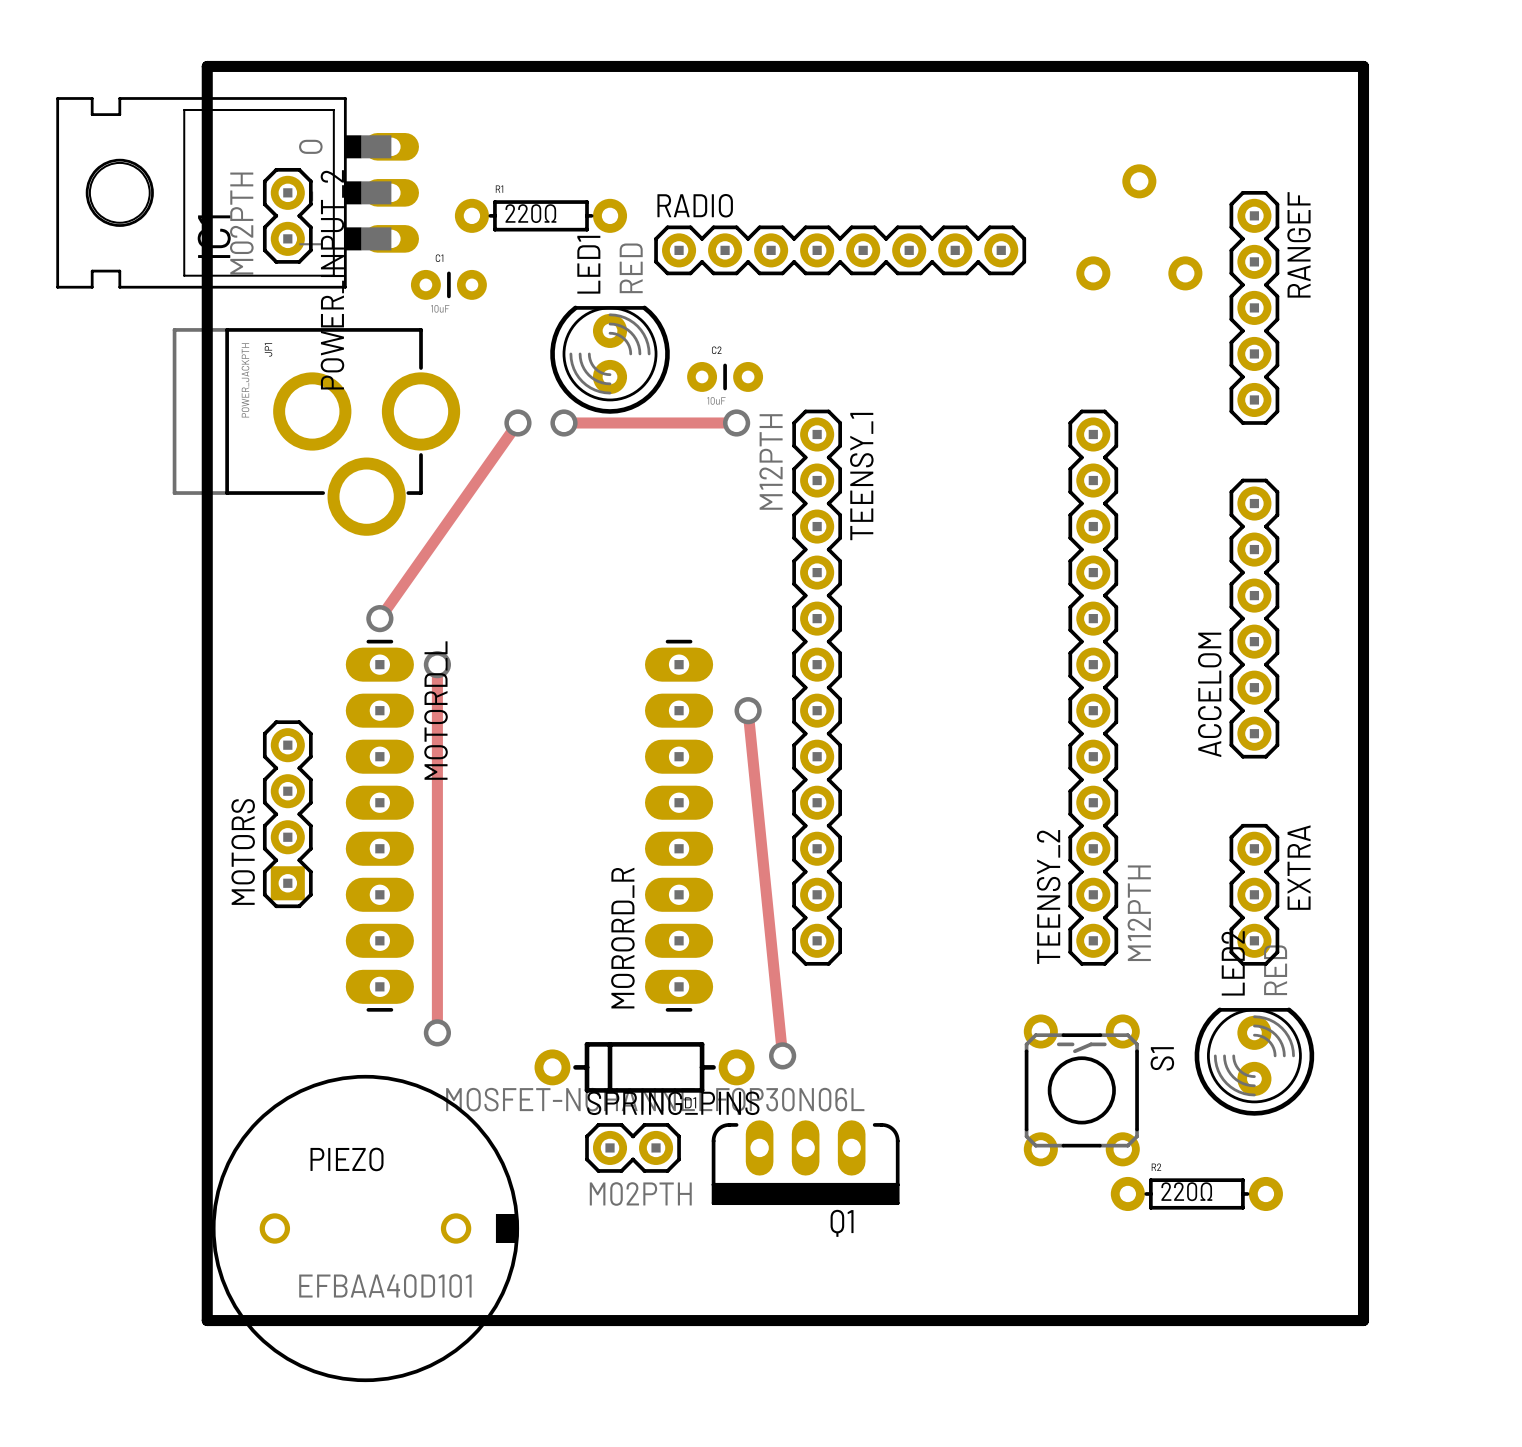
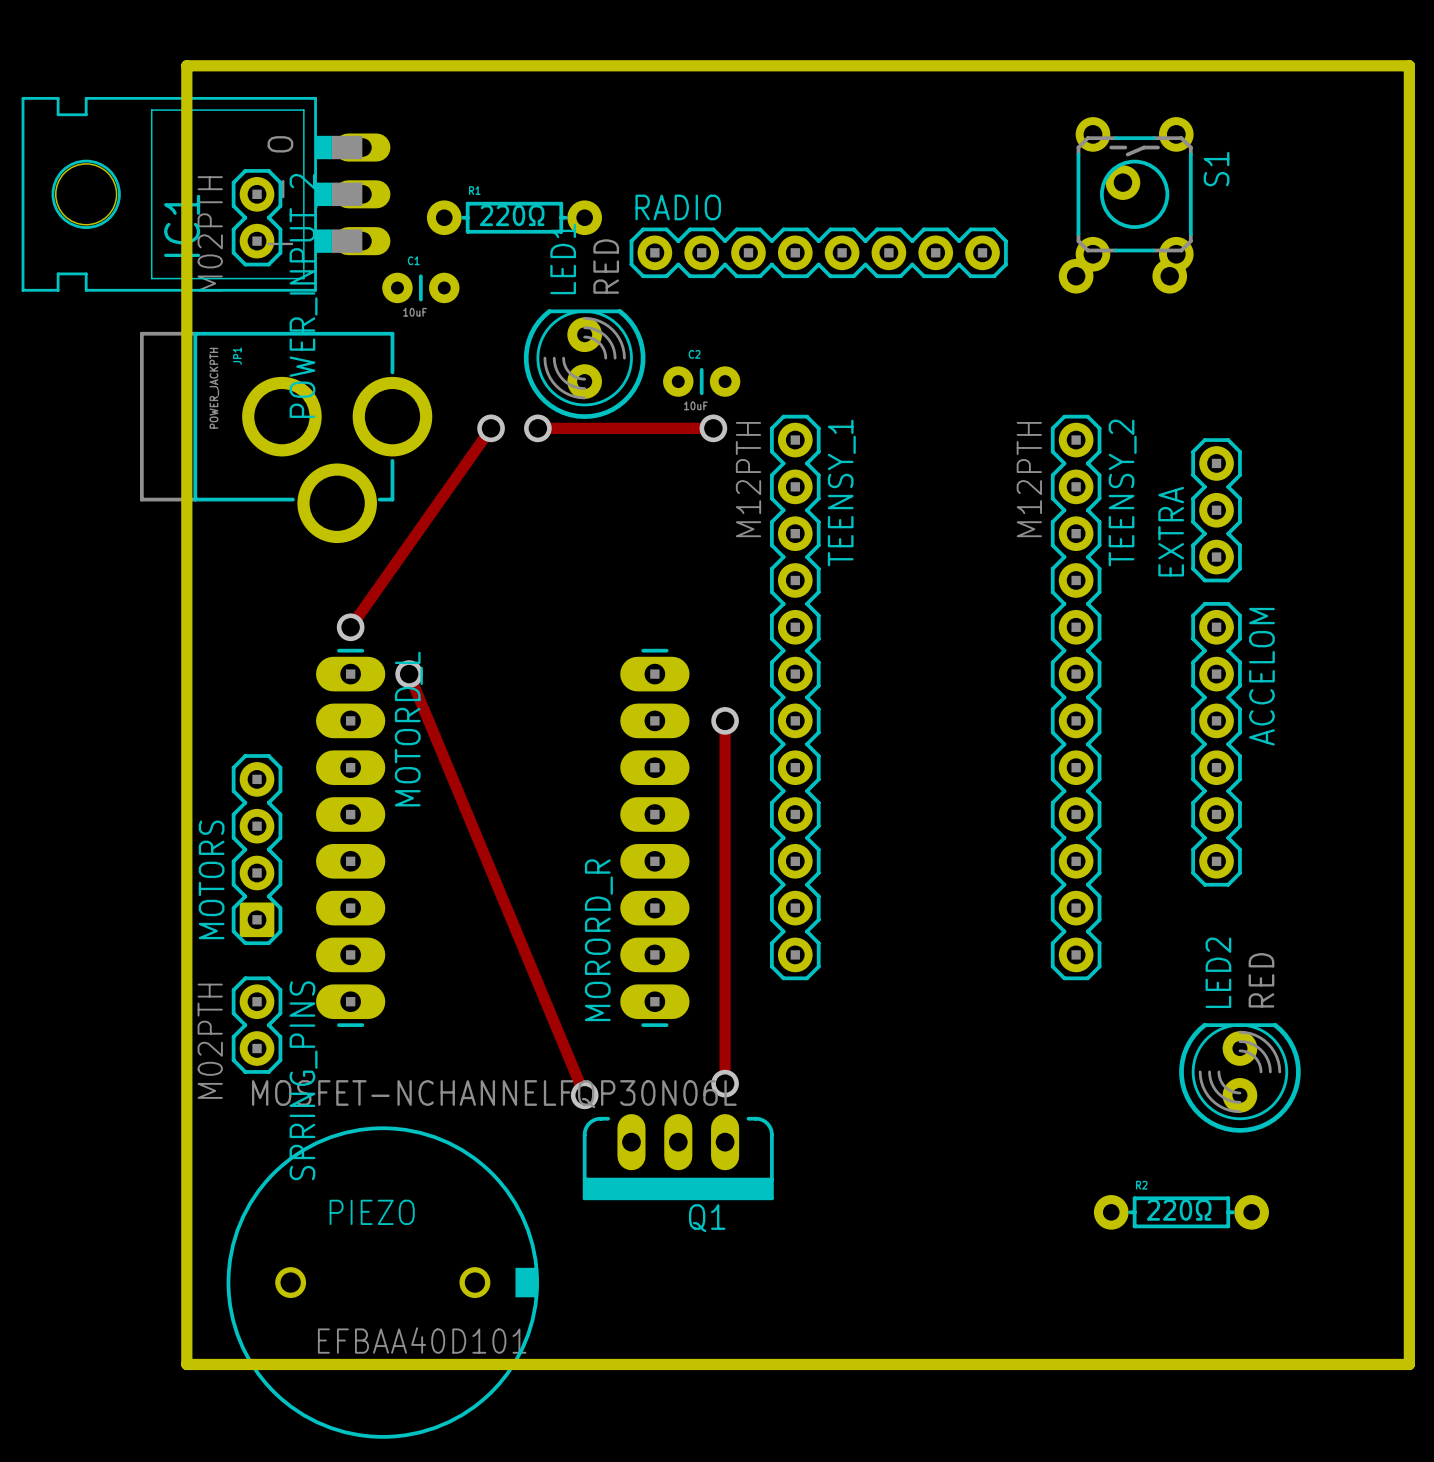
board edge: (218, 66) (207, 66) (207, 1320) (1363, 1320) (1363, 66) -> (186, 65) (186, 1364) (1409, 1364) (1409, 65) (1350, 65)
RANGEF: (1254, 307) -> none
ACCELOM position: (1254, 618) -> (1216, 744)
track: (437, 664) (437, 1032) -> (409, 674) (584, 1095)
ACCELOM name position: ACCELOM (1209, 694) -> ACCELOM (1261, 676)
track: (748, 710) (782, 1055) -> (725, 720) (725, 1083)
MOTORS position: (287, 814) -> (257, 849)
EXTRA name position: EXTRA (1299, 867) -> EXTRA (1171, 531)
EXTRA position: (1254, 894) -> (1216, 510)
TEENSY_2 name position: TEENSY_2 (1048, 896) -> TEENSY_2 (1122, 493)
TEENSY_2 value position: M12PTH (1139, 913) -> M12PTH (1029, 479)
via: (437, 1032) -> none
via position: (782, 1055) -> (725, 1083)
D1: (644, 1067) -> none
via: none -> (584, 1095)
S1 position: (1081, 1090) -> (1134, 194)
SPRING_PINS rotation: 0° (633, 1147) -> 90° clockwise (257, 1025)
SPRING_PINS position: (633, 1147) -> (257, 1025)
Q1 position: (805, 1162) -> (678, 1157)
PIEZO position: (365, 1228) -> (382, 1282)

